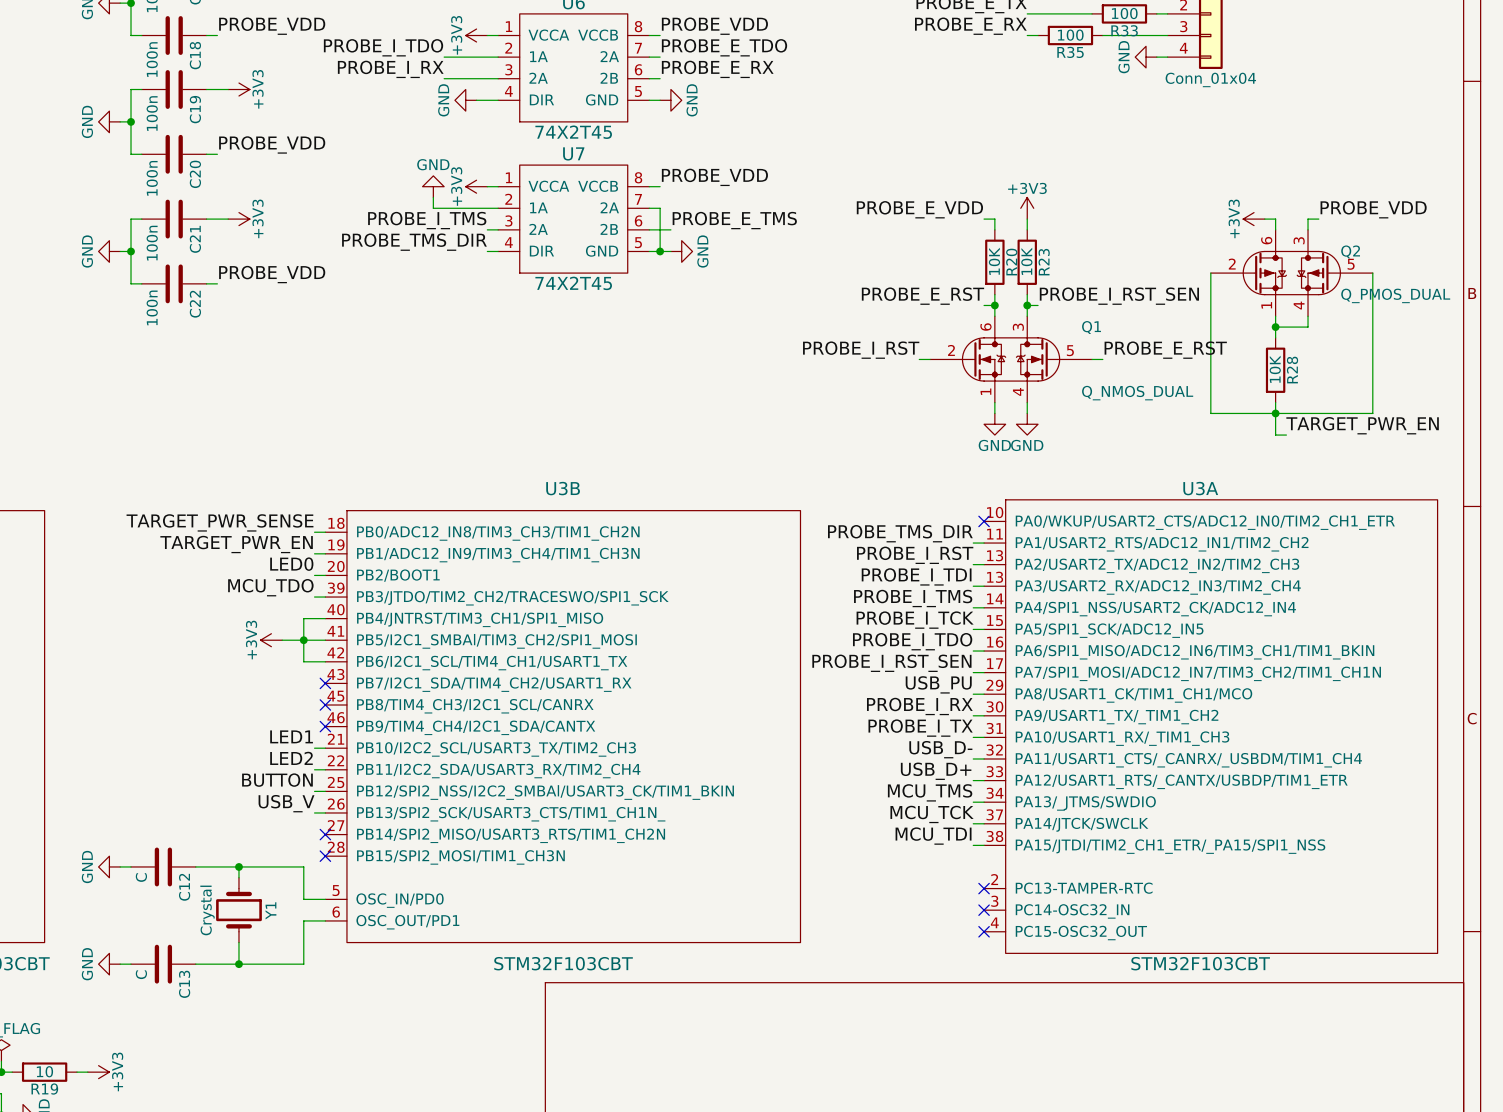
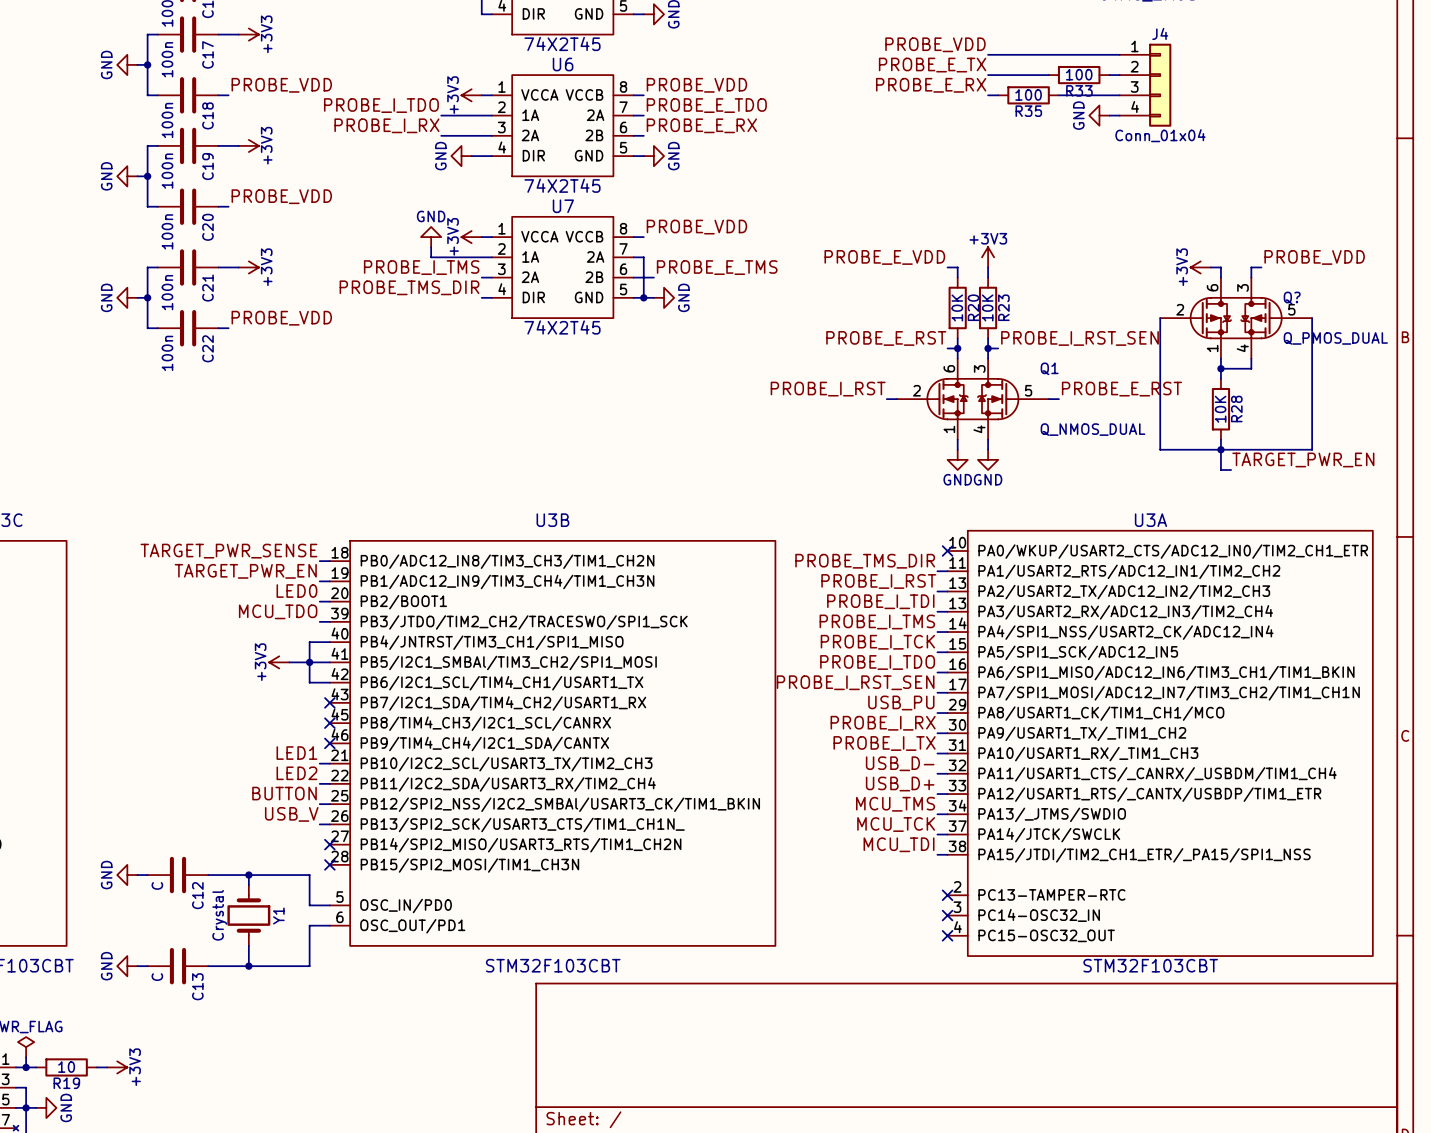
Q2 name: Q2 (1350, 251) -> Q? (1292, 297)

